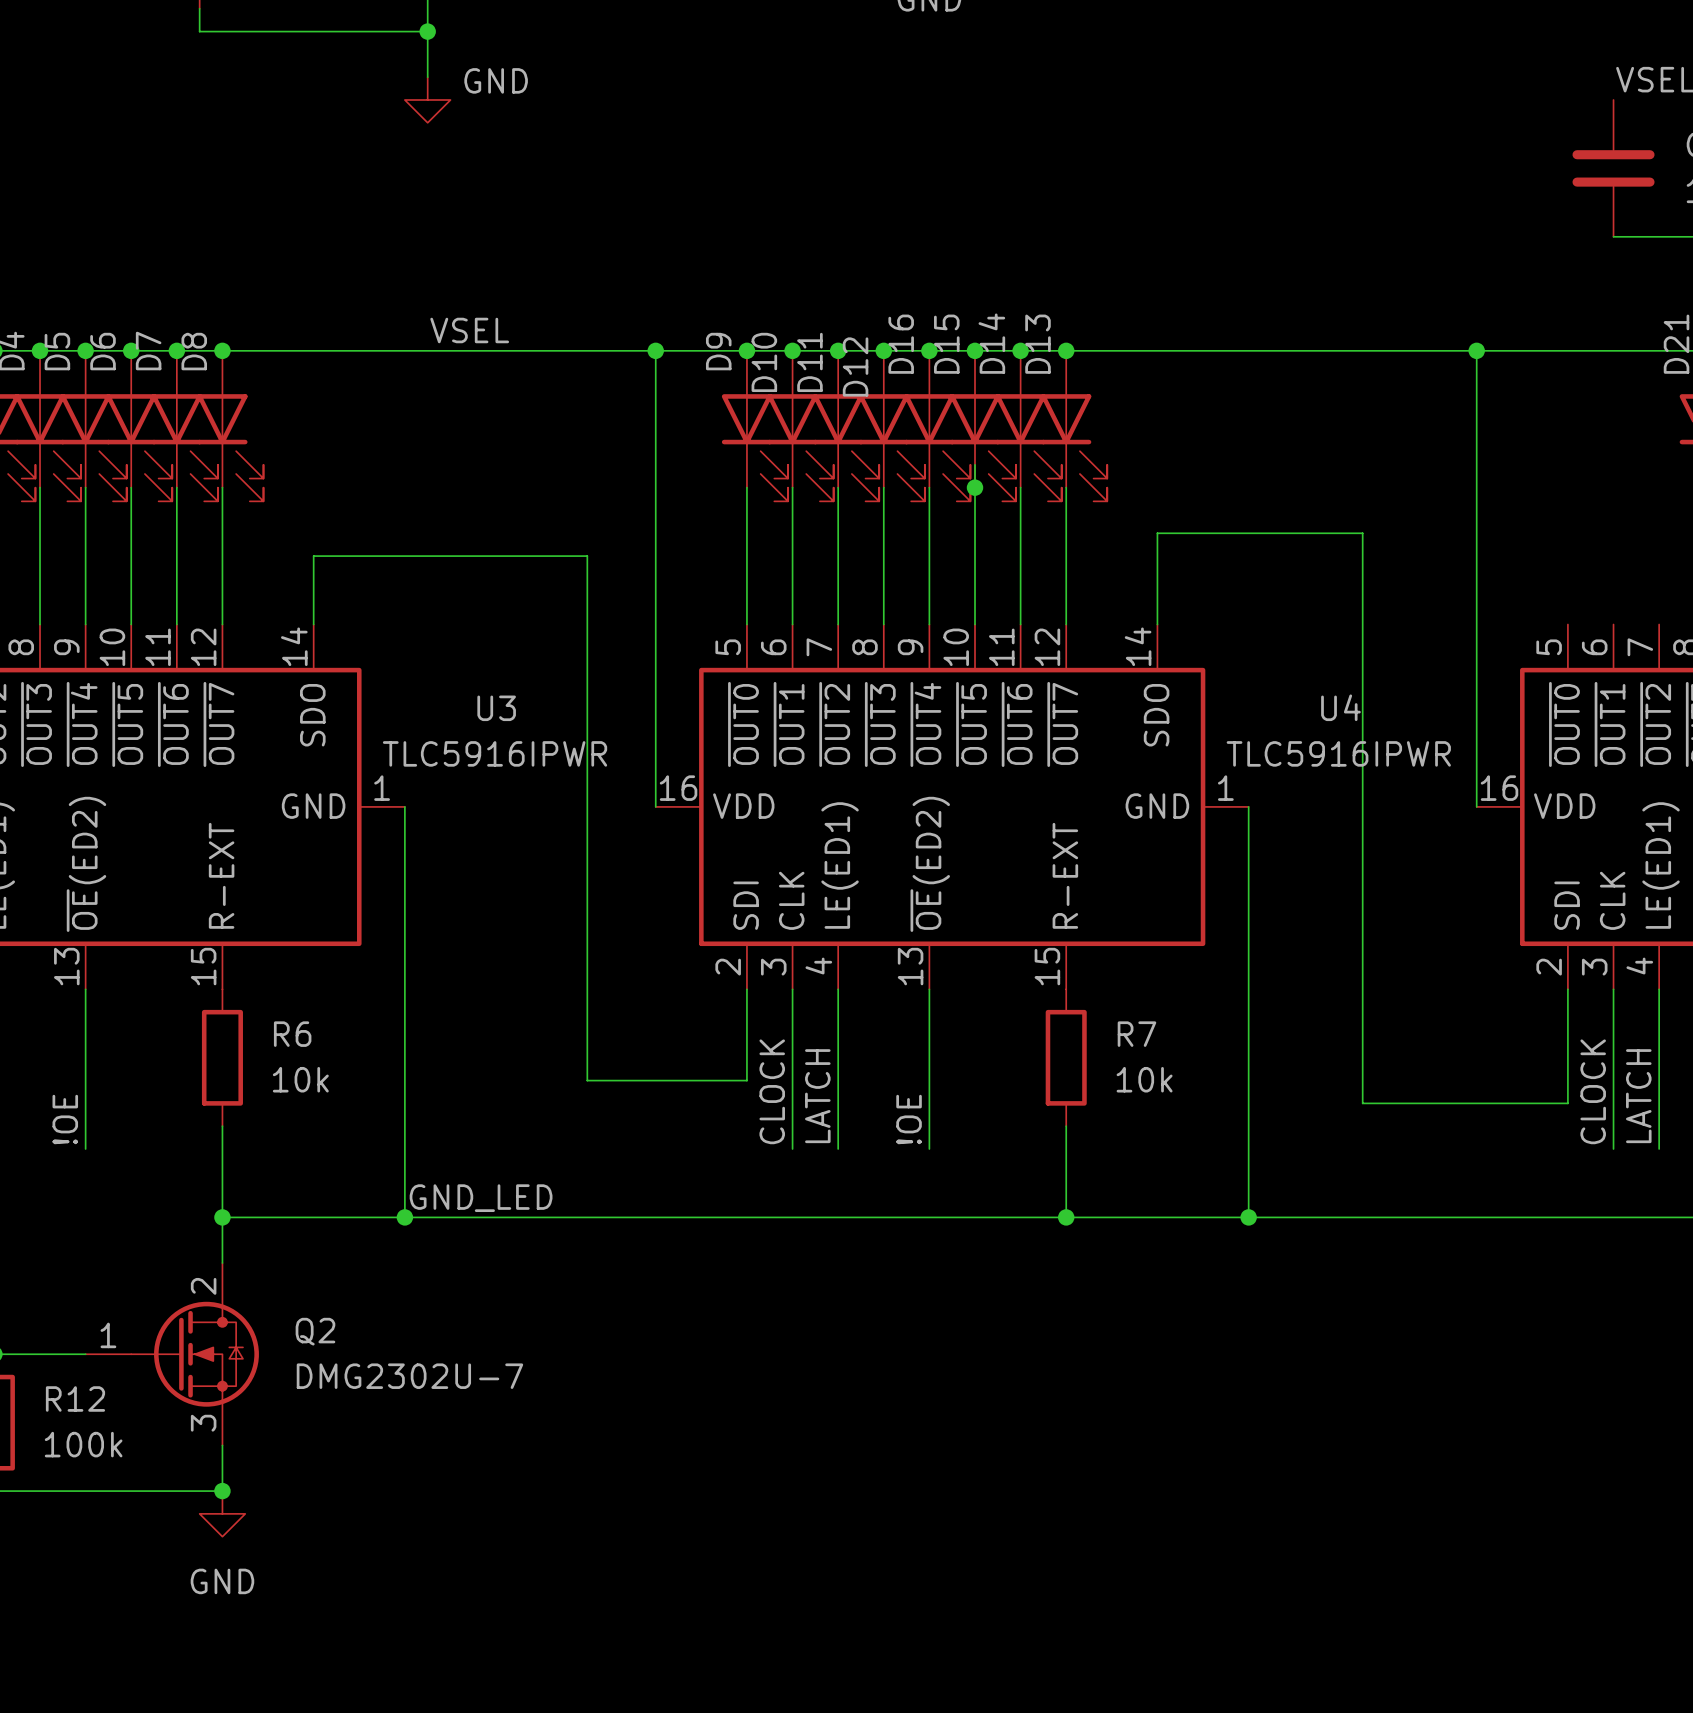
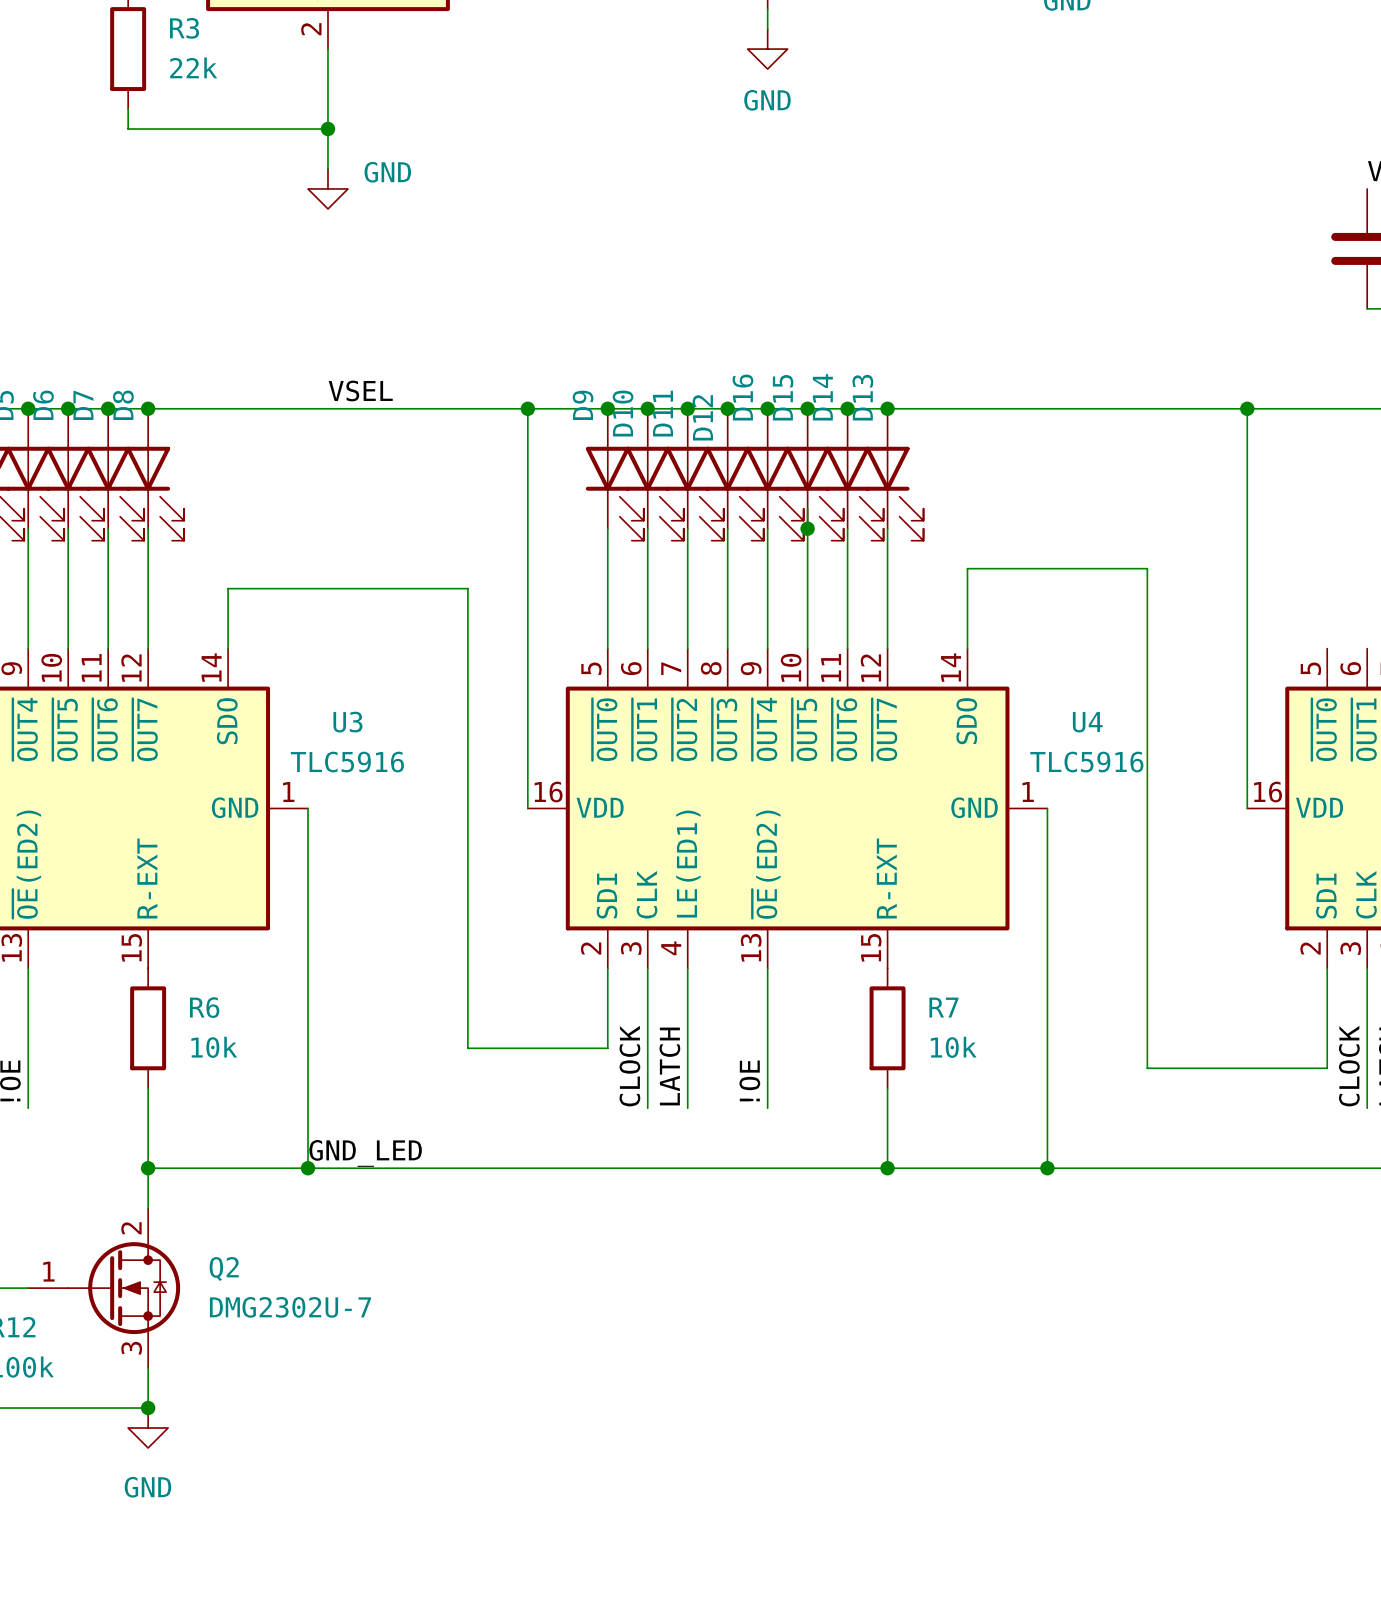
U4 name position: U4 (1340, 707) -> U4 (1087, 722)
U3 name position: U3 (496, 708) -> U3 (347, 722)
U3 value: TLC5916IPWR (495, 753) -> TLC5916 (347, 762)
U4 value: TLC5916IPWR (1338, 753) -> TLC5916 (1086, 762)

